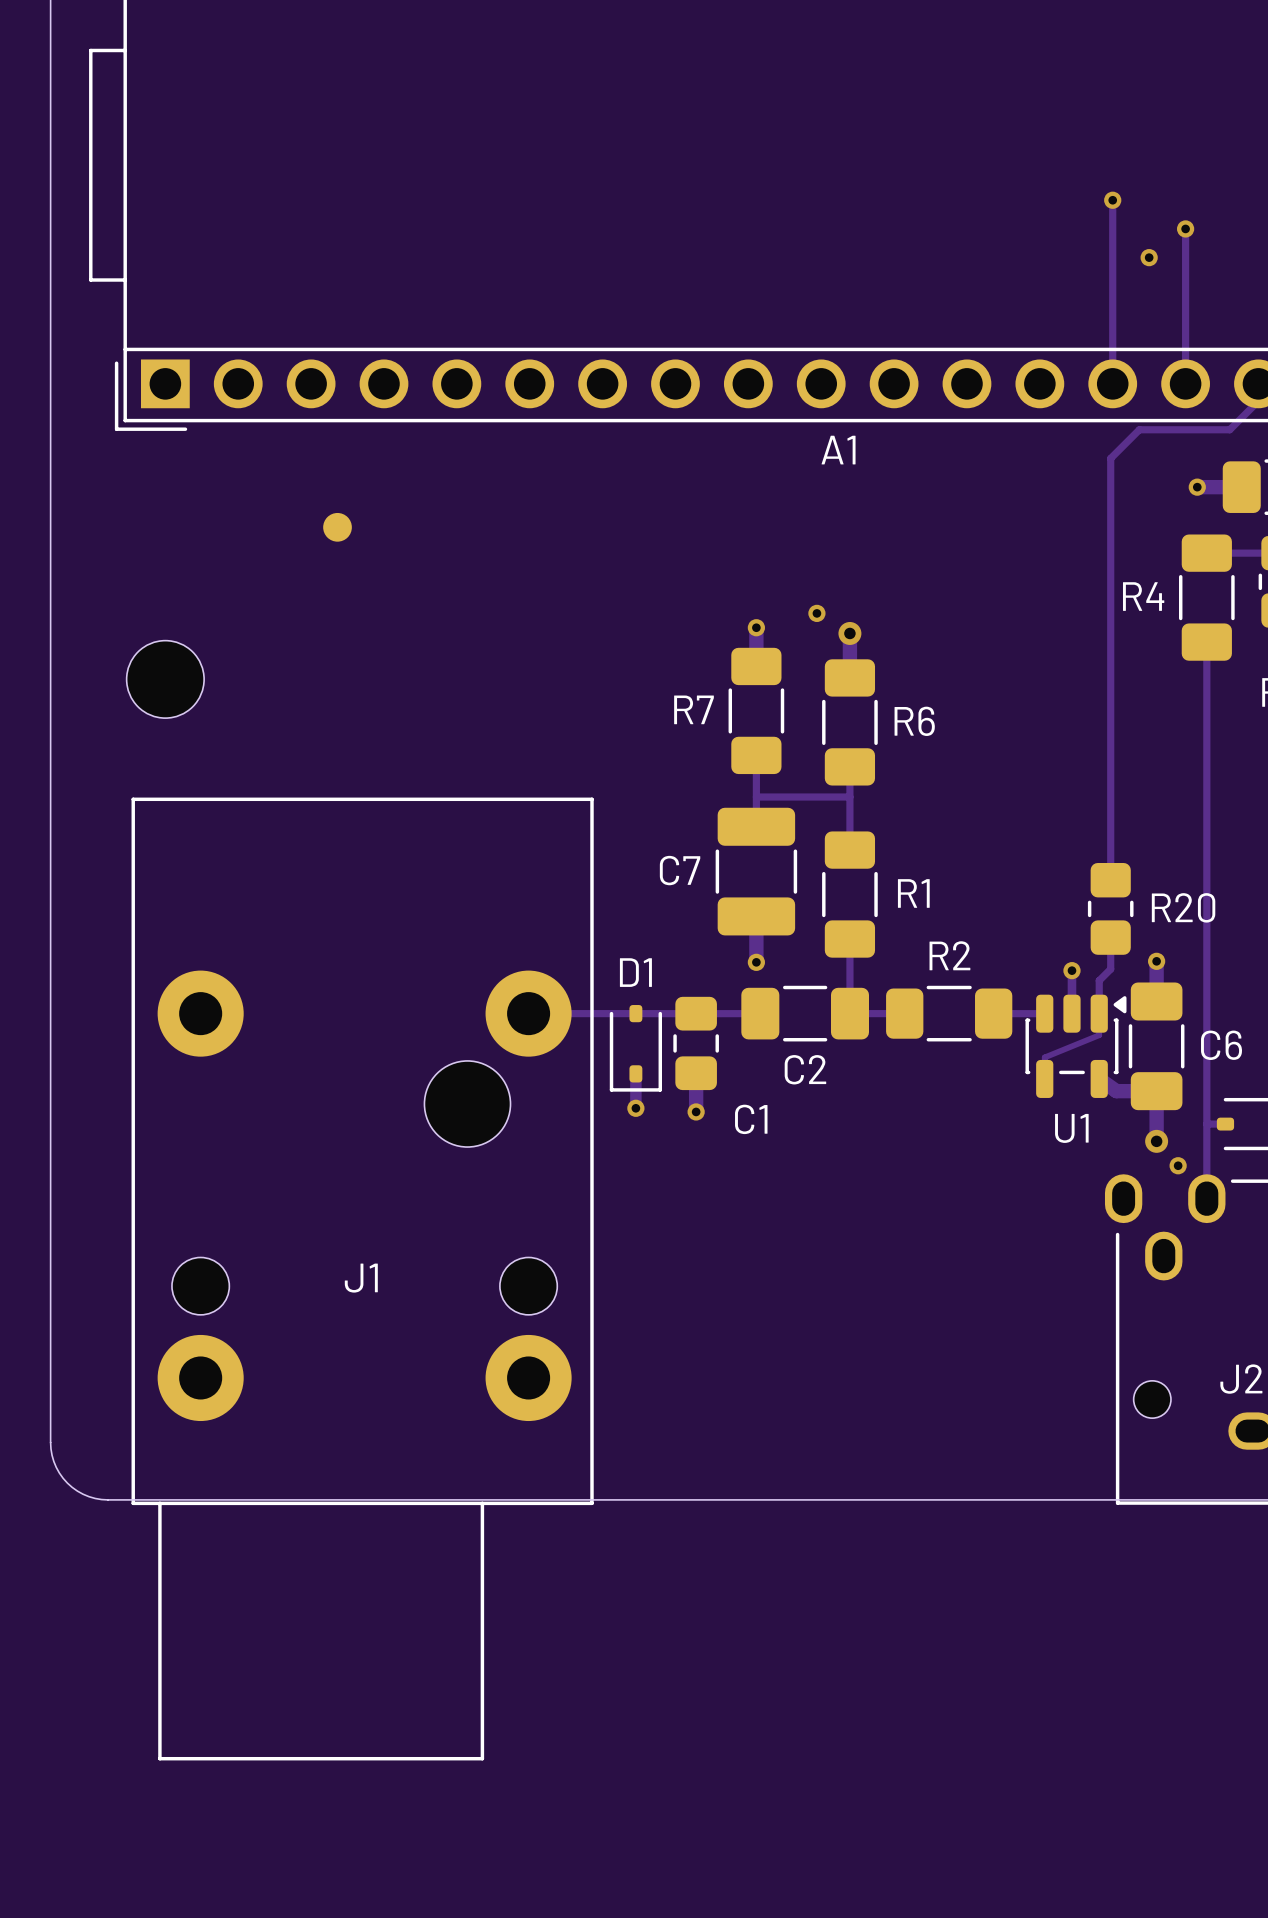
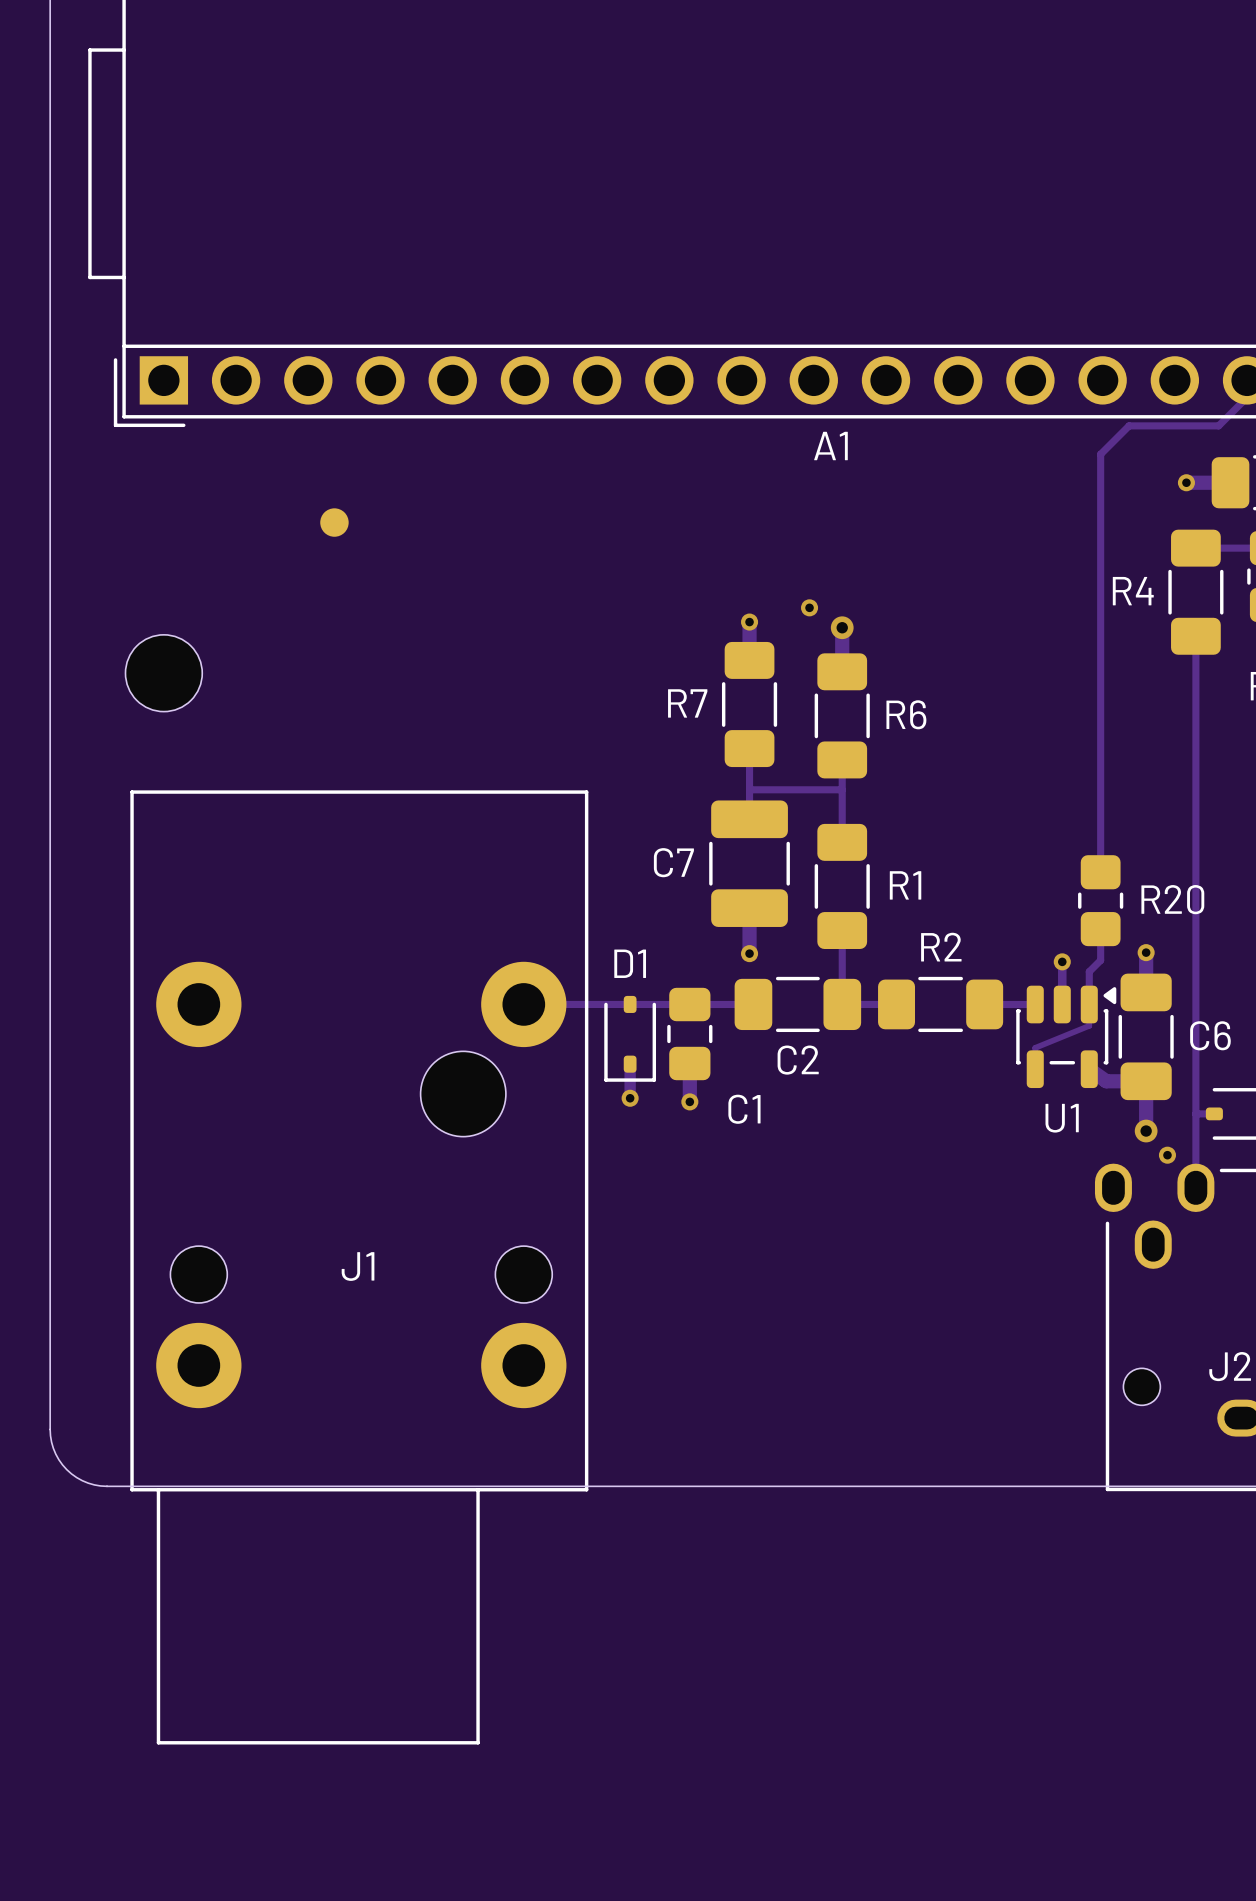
track: (1112, 200) (1112, 383) -> none
via: (1112, 200) -> none
track: (1185, 228) (1185, 383) -> none
via: (1185, 228) -> none
via: (1149, 257) -> none

